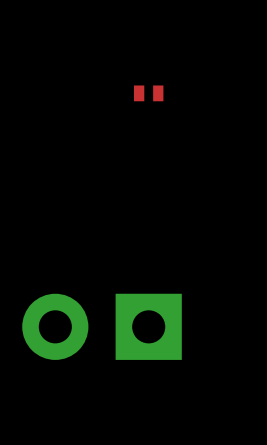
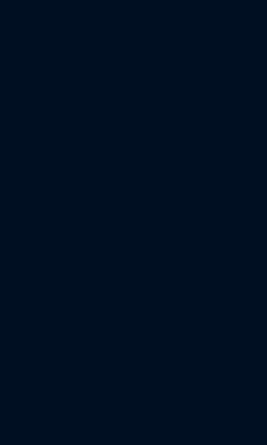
part: (148, 93) -> none
part: (102, 326) -> none

